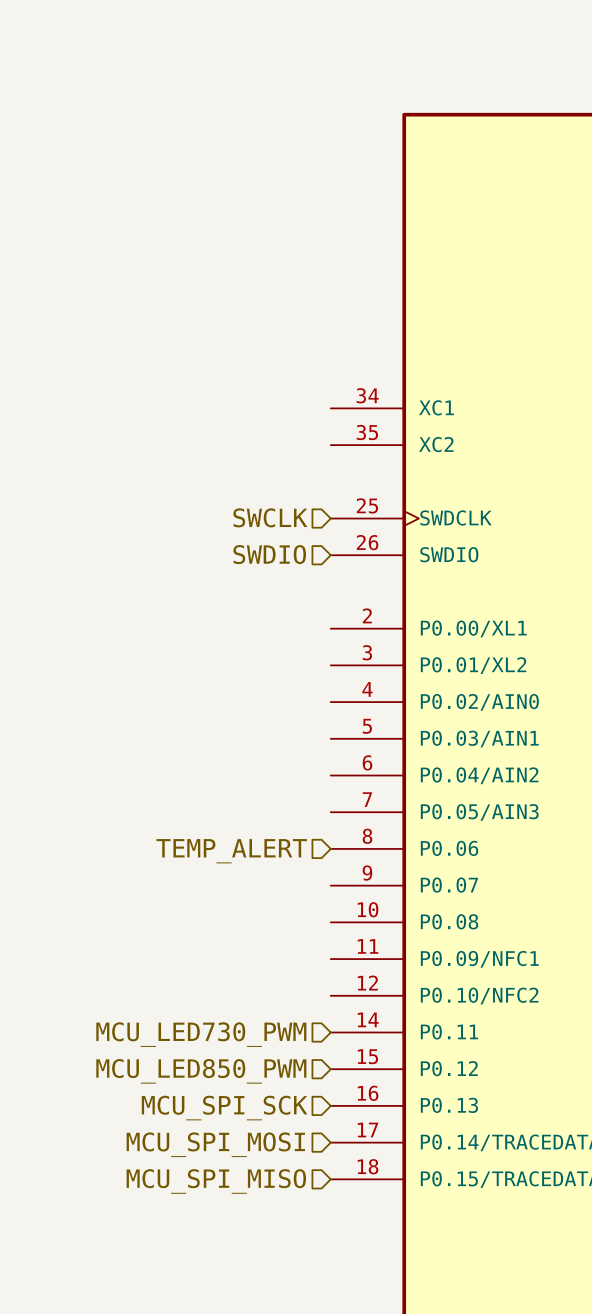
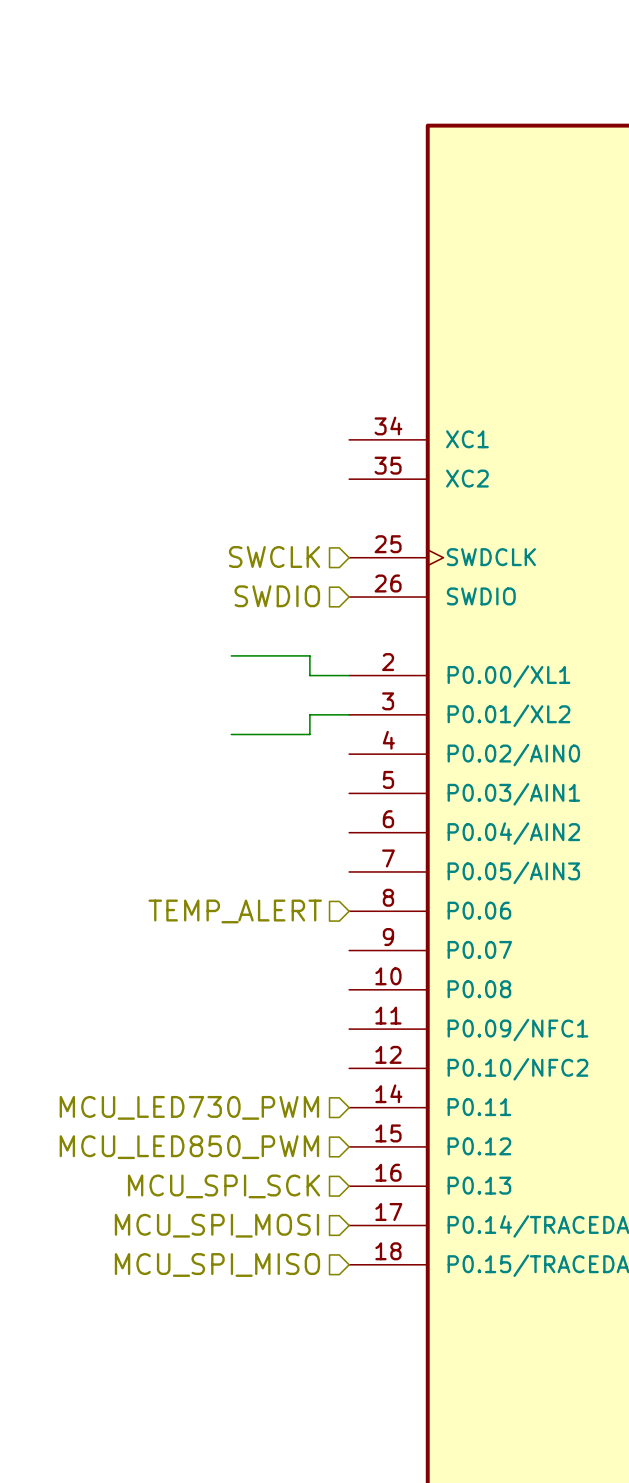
wire: none -> (231, 655) (309, 655) (309, 675) (349, 675)
wire: none -> (349, 714) (309, 714) (309, 734) (231, 734)

